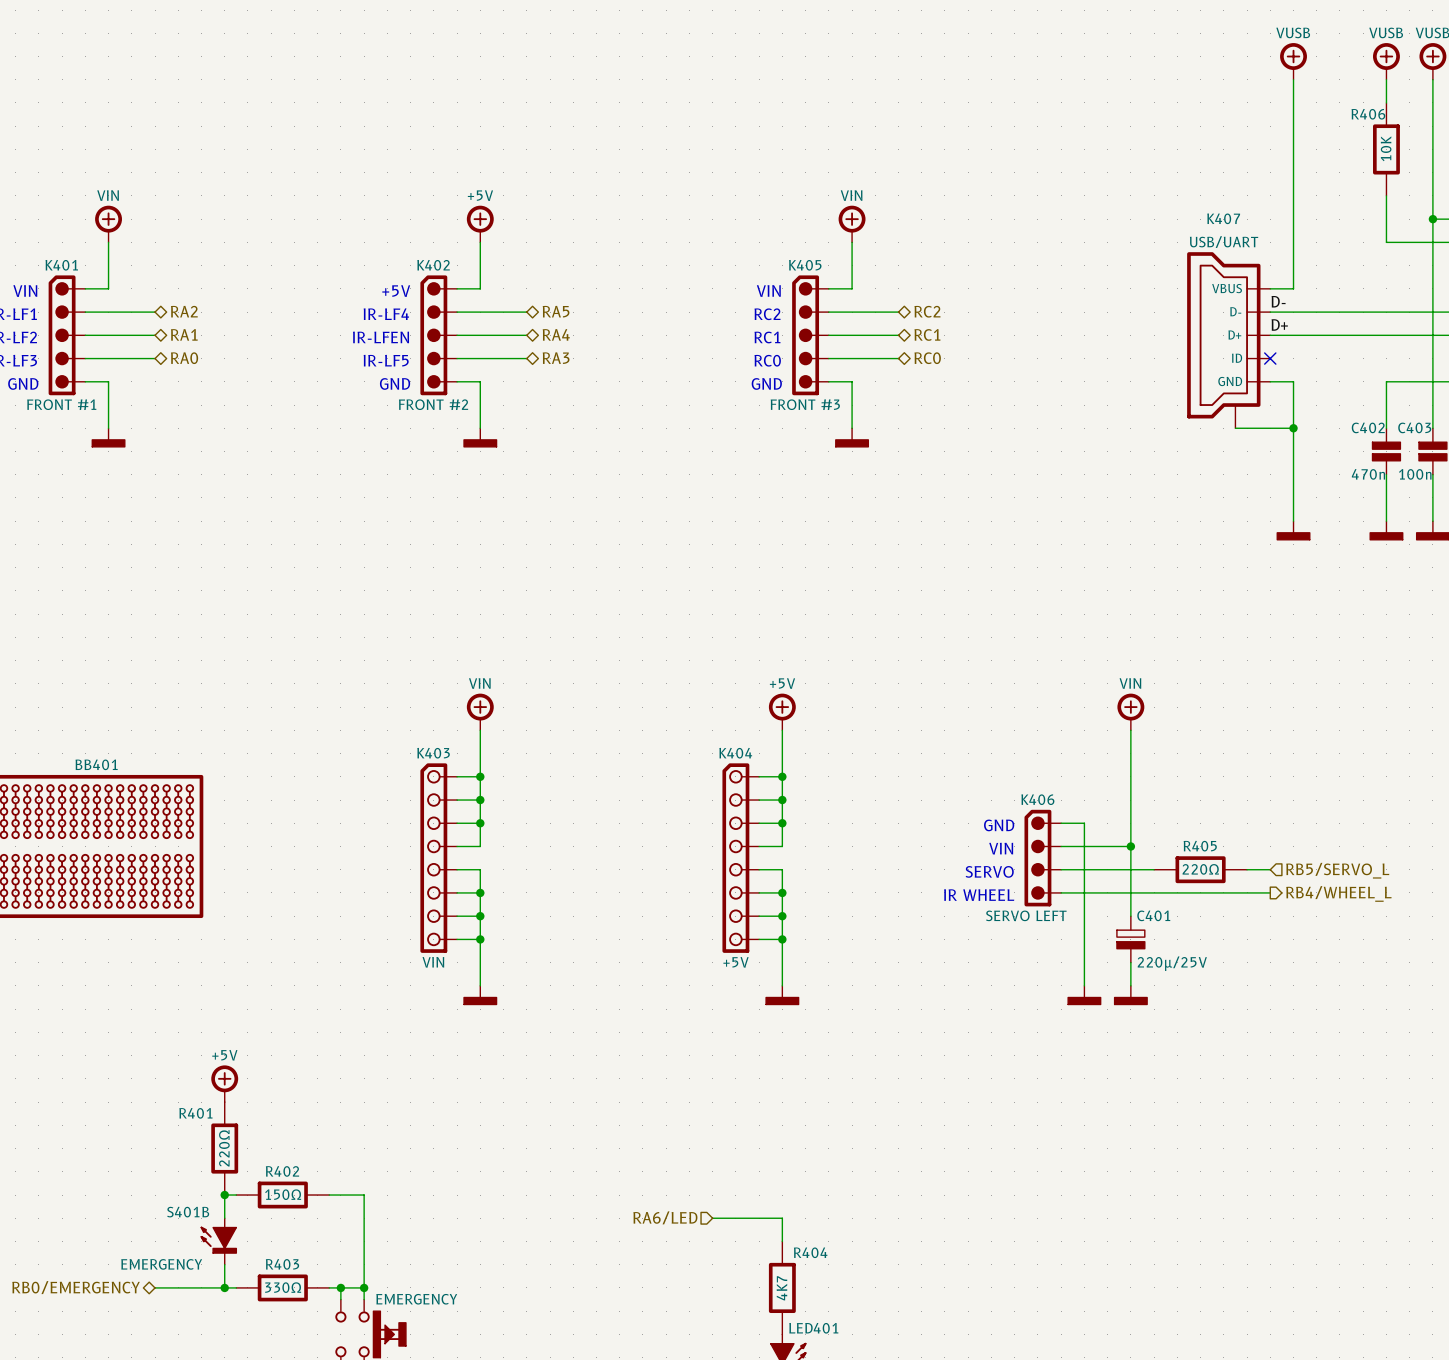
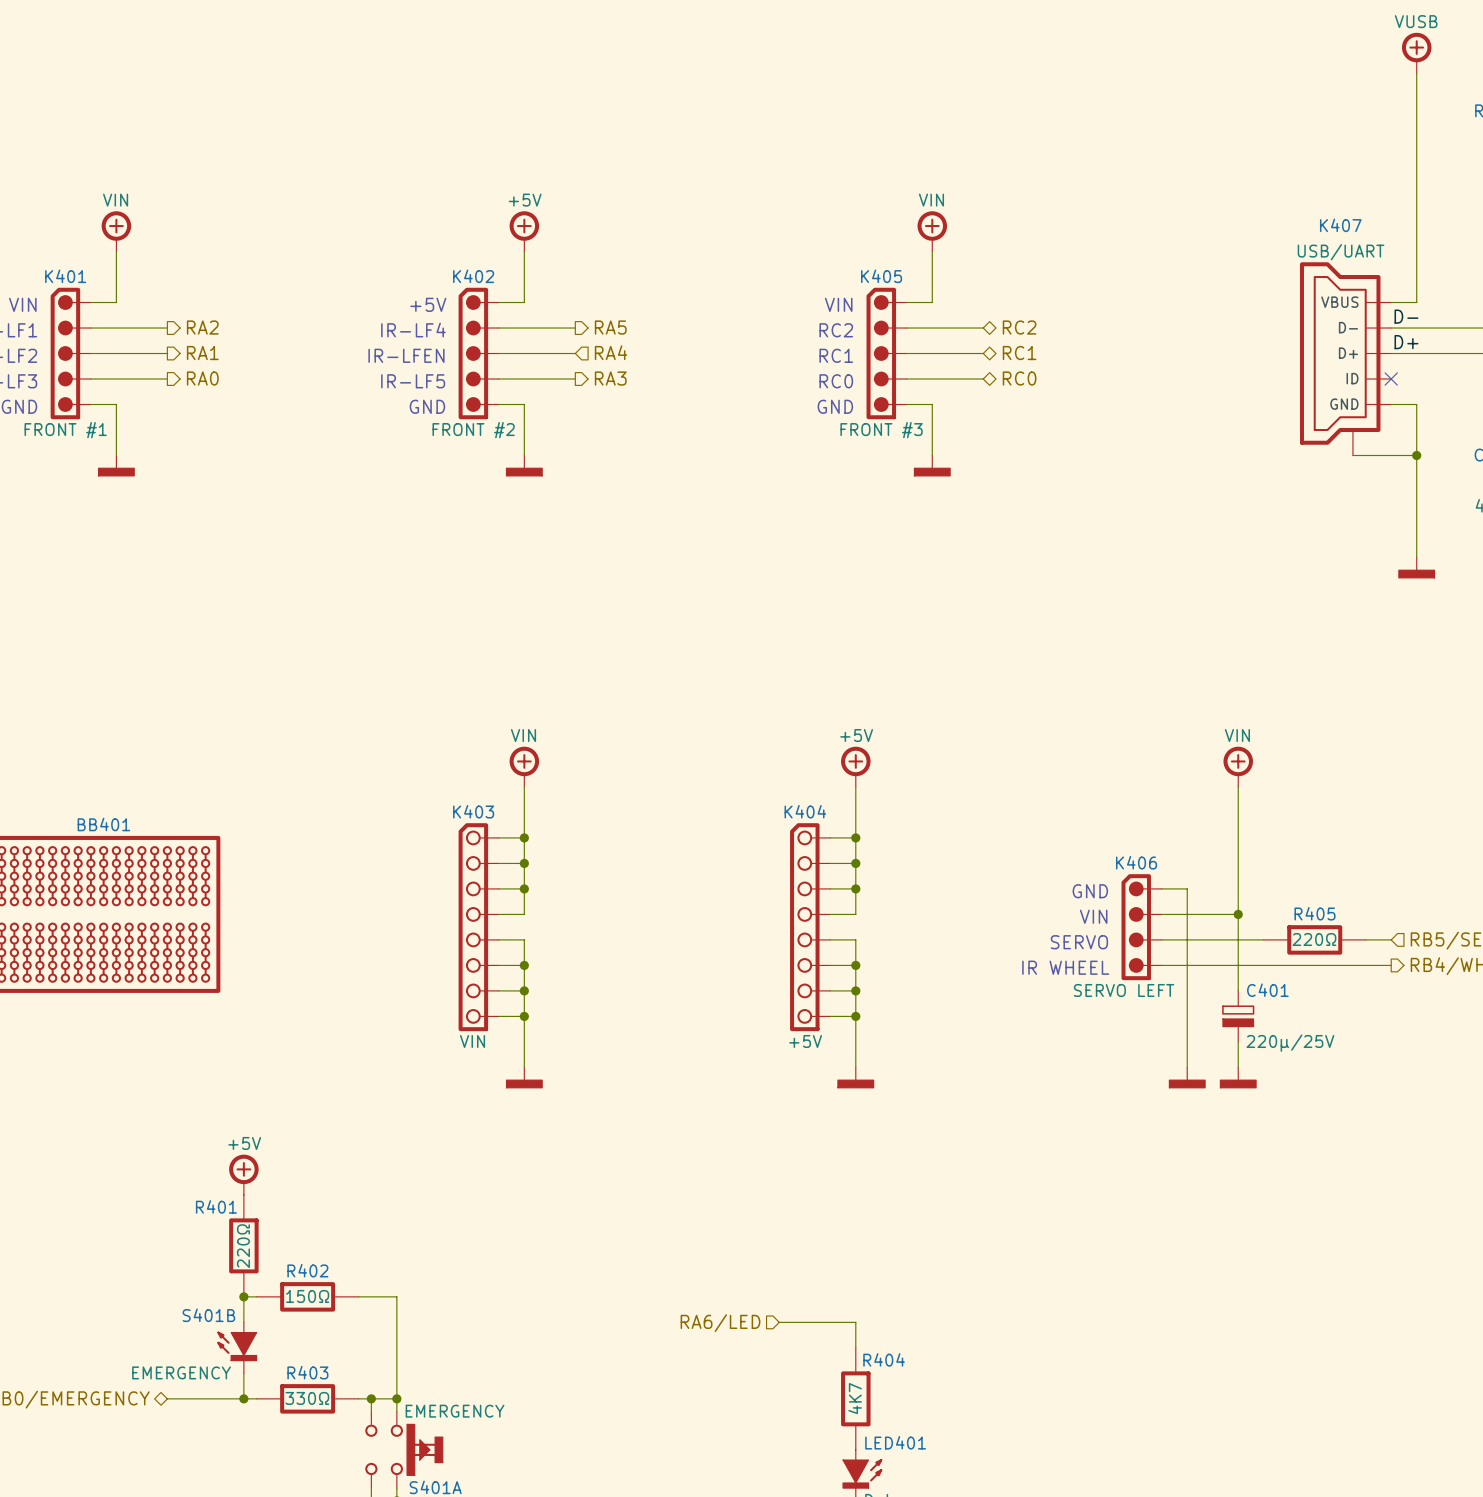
hierarchical label shape: bidirectional (184, 311) -> output (202, 327)
hierarchical label shape: bidirectional (556, 311) -> output (610, 327)
hierarchical label shape: bidirectional (184, 334) -> output (202, 353)
hierarchical label shape: bidirectional (556, 334) -> input (611, 352)
hierarchical label shape: bidirectional (184, 358) -> output (202, 378)
hierarchical label shape: bidirectional (556, 358) -> output (610, 378)

